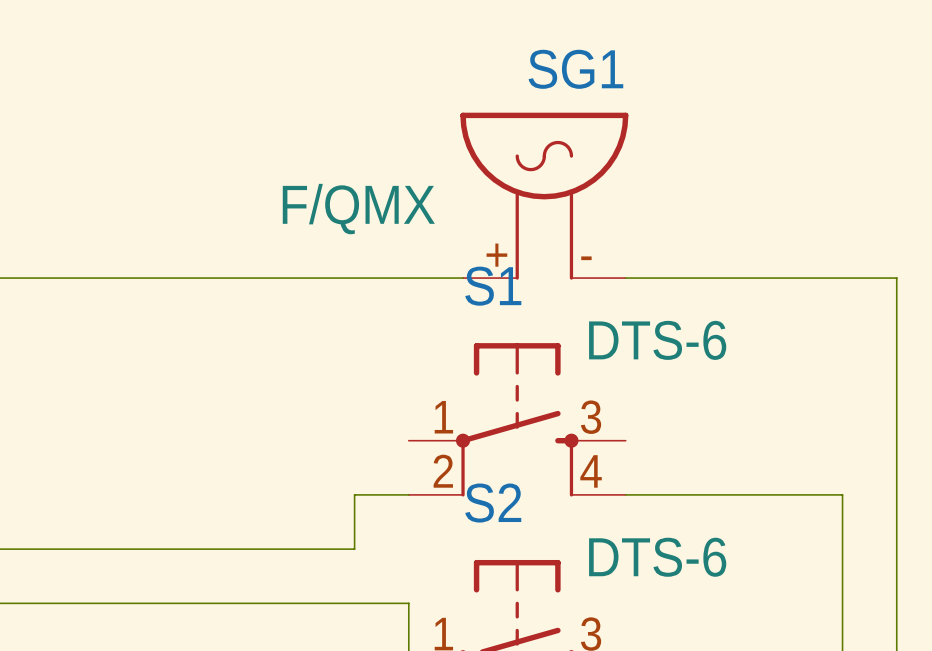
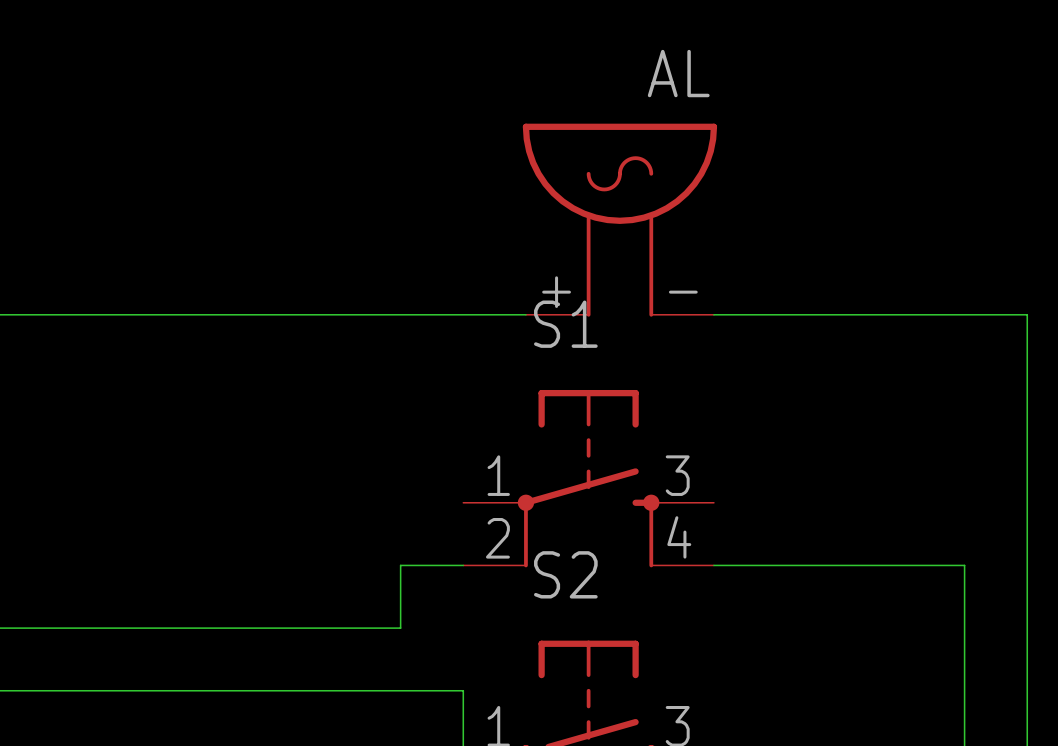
SG1 name: SG1 (575, 69) -> AL (678, 73)
SG1 value: F/QMX (358, 209) -> none
S1 value: DTS-6 (657, 340) -> none
S2 value: DTS-6 (657, 557) -> none

